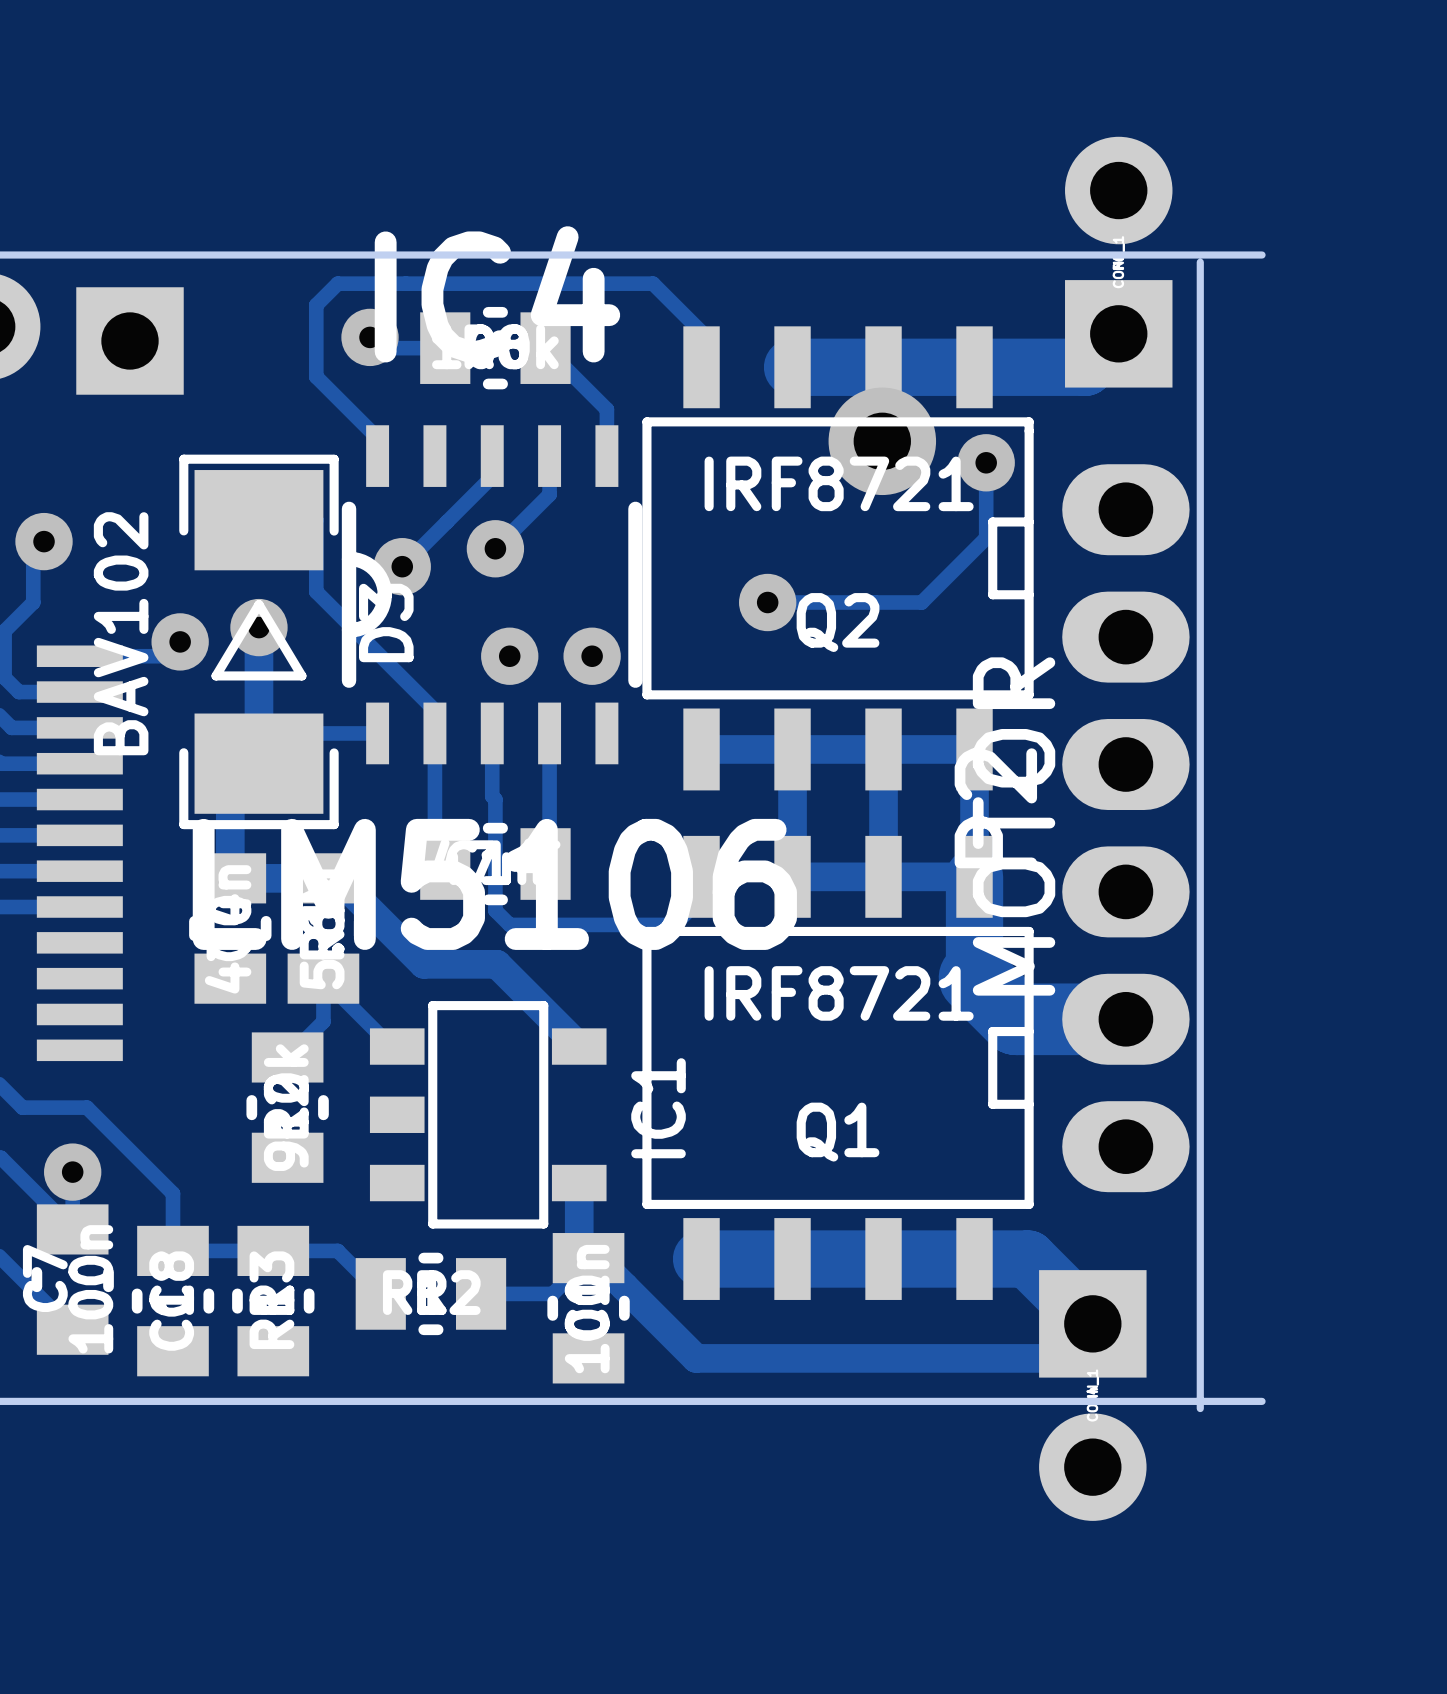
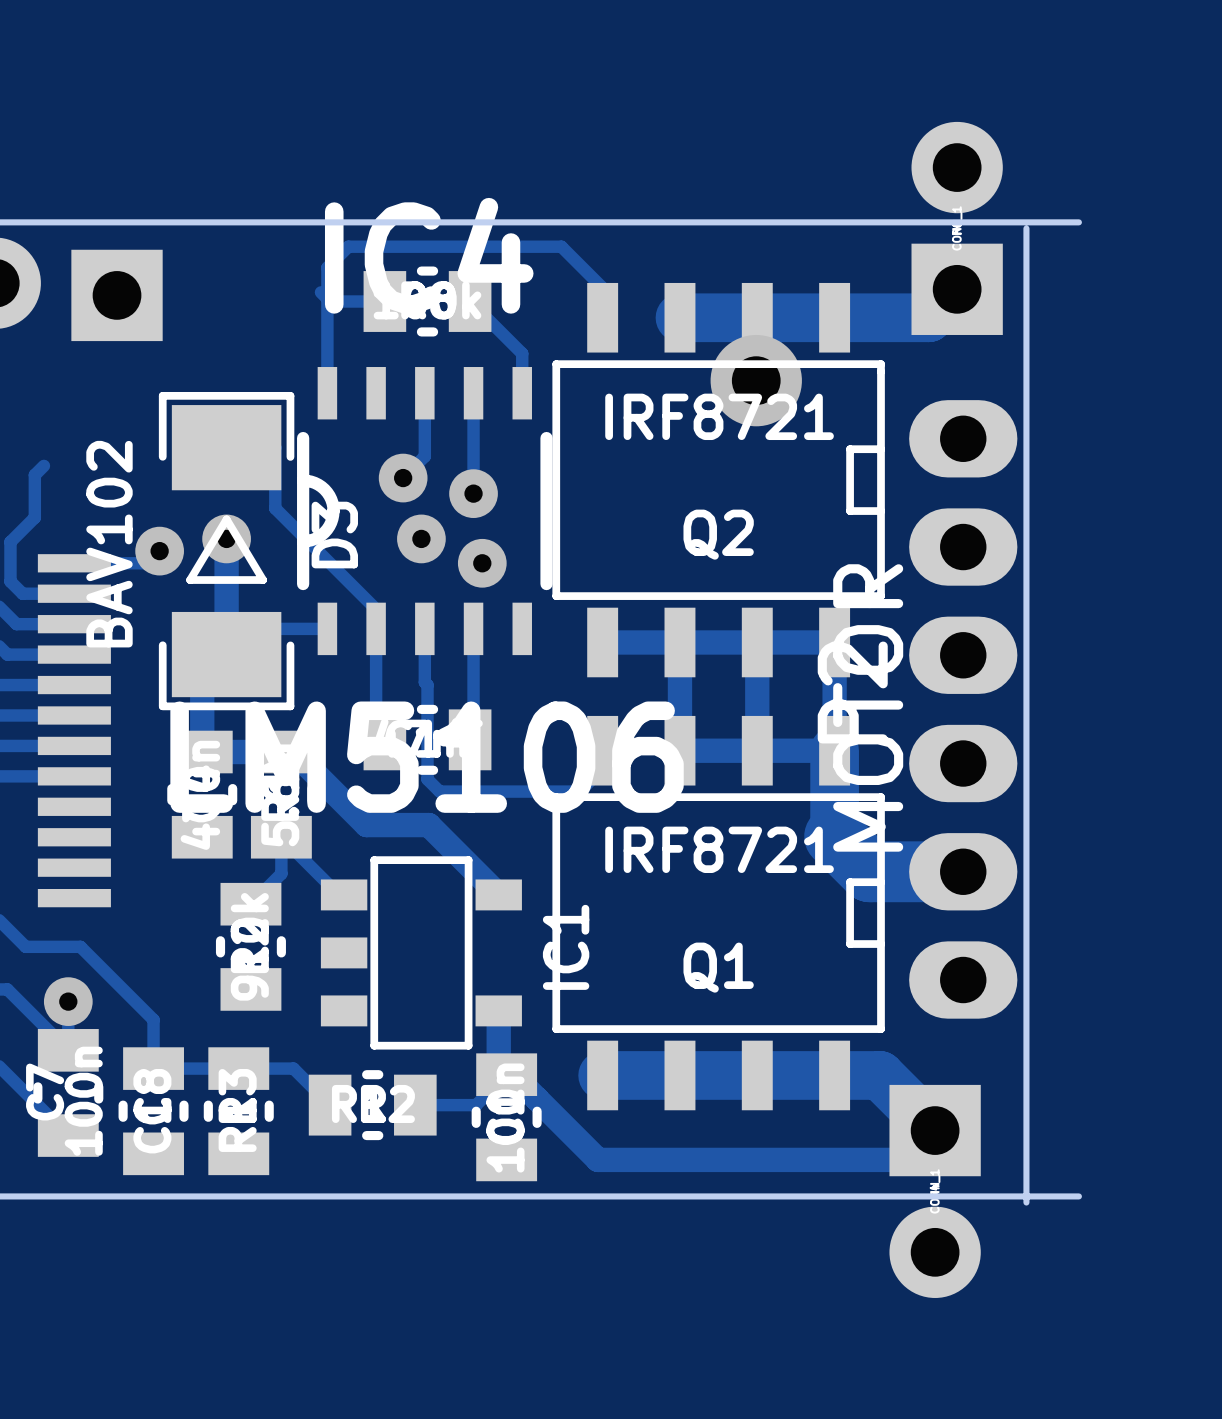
track: (402, 283) (337, 283) (316, 305) (316, 376) (377, 438) -> (348, 246) (327, 267) (327, 377)
via: (370, 337) -> none
track: (986, 462) (986, 538) (921, 602) (767, 602) -> none
via: (986, 462) -> none
track: (492, 476) (402, 566) -> (424, 410) (424, 456) (403, 478)
track: (549, 494) (495, 548) -> (473, 425) (473, 493) (476, 496)
via: (44, 541) -> none
via: (495, 548) -> none
via: none -> (403, 478)
via: (402, 566) -> none
via: none -> (473, 493)
via: (767, 602) -> none
via: none -> (421, 538)
via: (509, 656) -> none
via: none -> (482, 563)
via: (592, 656) -> none

